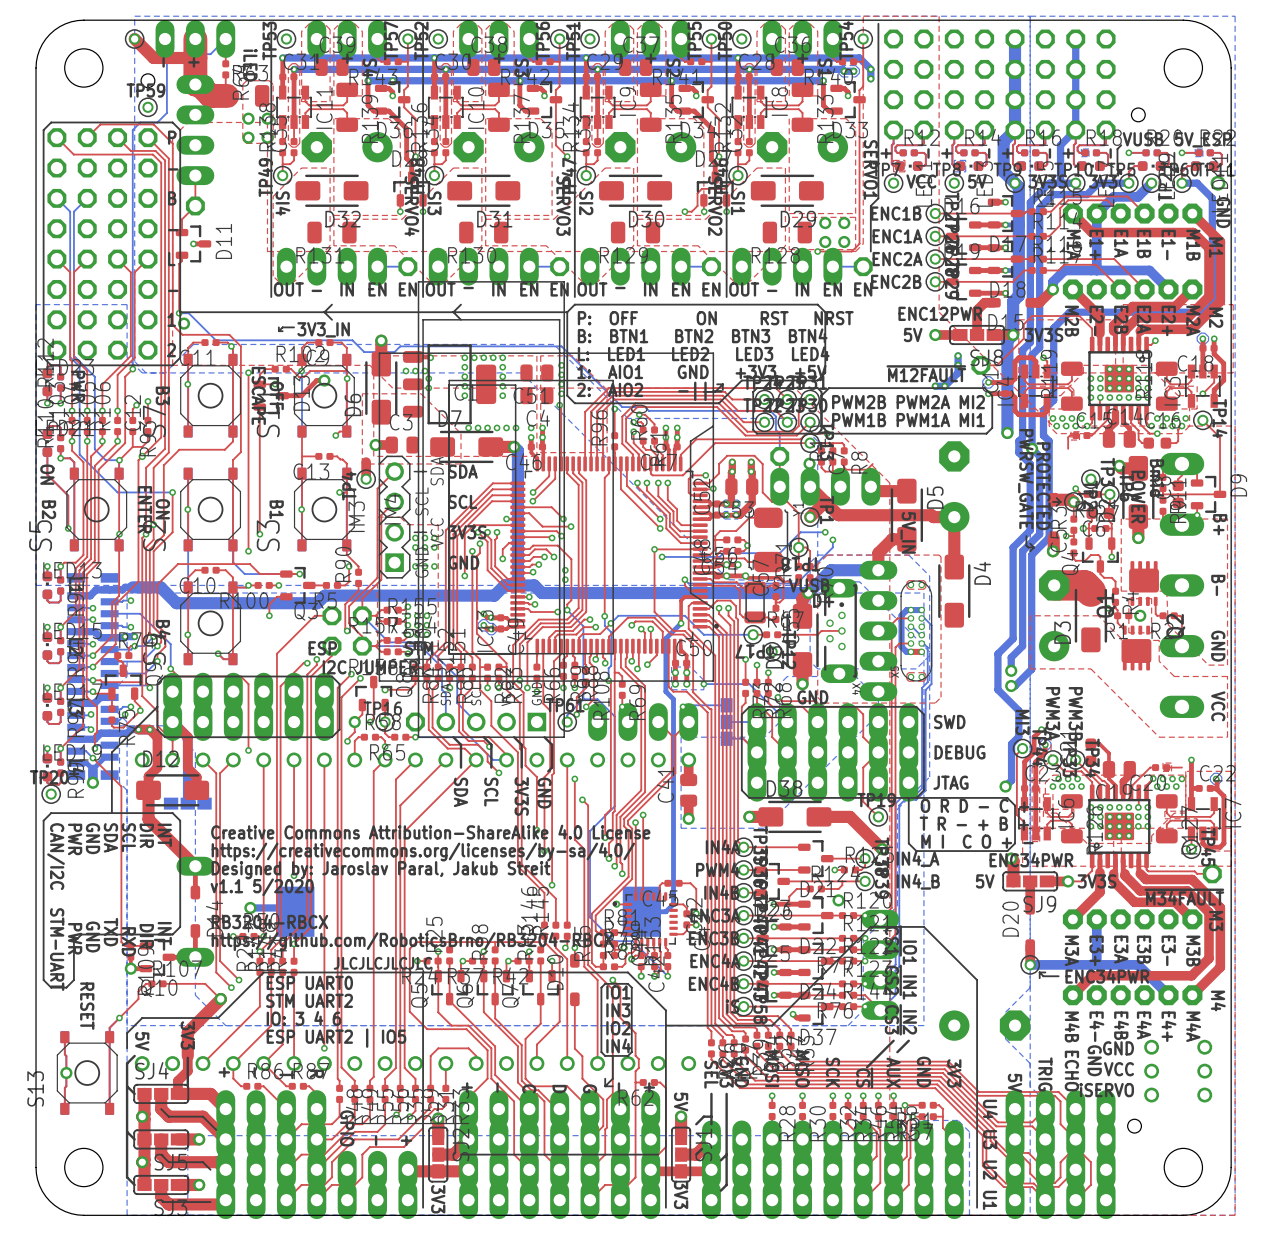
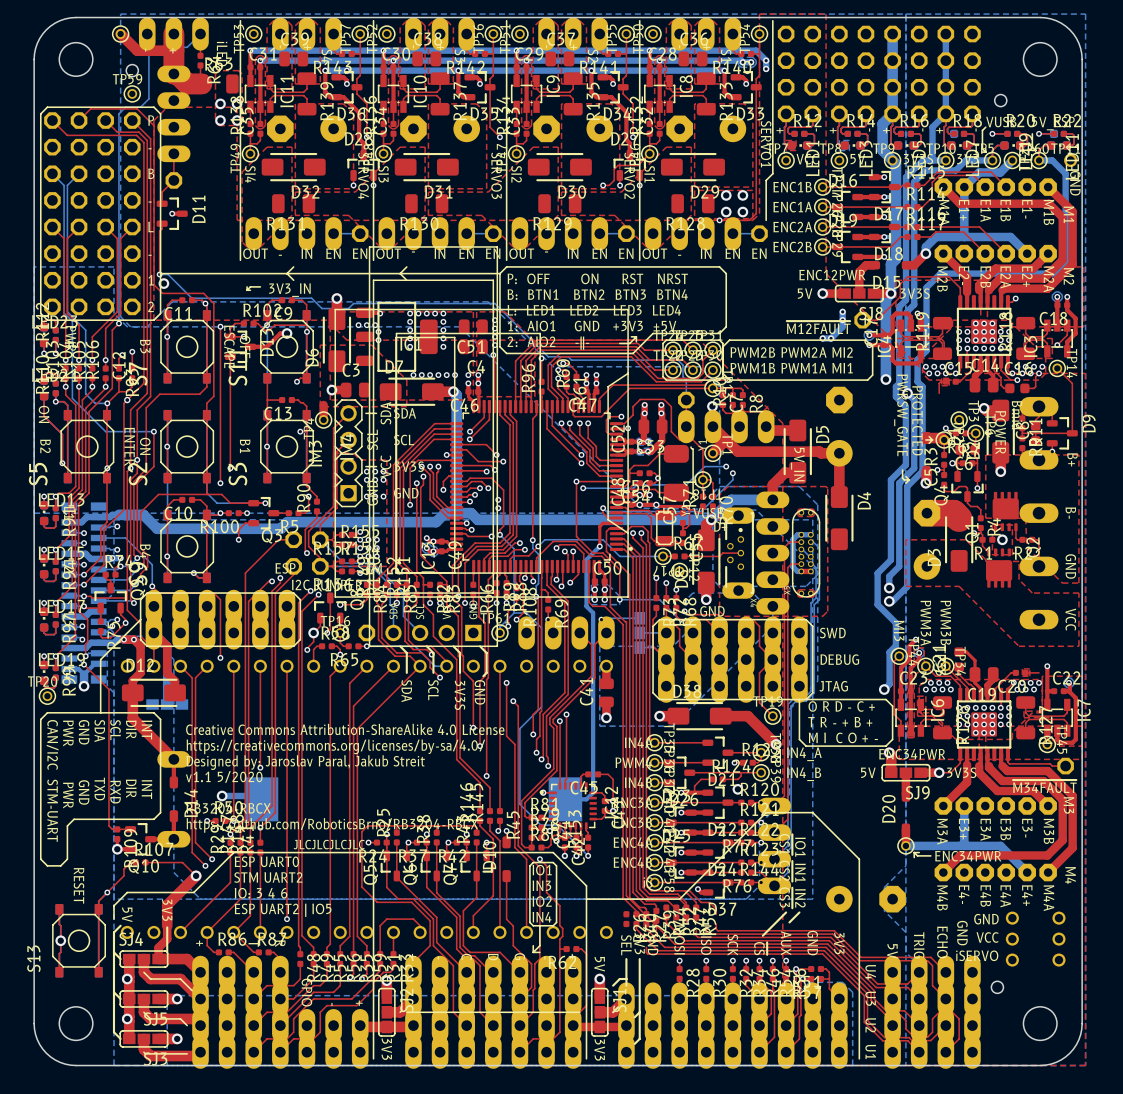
top track: none -> (684, 890) (689, 890) (701, 902) (709, 902) (716, 909) (716, 914)
top track: (711, 1021) (711, 1025) (722, 1036) (722, 1042) -> (626, 895) (656, 925) (656, 934)
top track: (707, 1023) (707, 1027) (711, 1031) (711, 1042) -> (623, 897) (646, 920) (646, 923)
top track: (762, 1023) (768, 1029) (768, 1035) -> (671, 897) (677, 897) (696, 917)
top track: (755, 1027) (756, 1035) -> (664, 900) (668, 900) (686, 919)
top track: (768, 1046) (768, 1052) (785, 1069) (793, 1069) -> (696, 930) (697, 937)
top track: (791, 1050) (800, 1061) (815, 1061) -> (716, 923) (717, 930)
top track: (779, 1052) (793, 1065) (804, 1065) -> (706, 927) (707, 934)
top track: (711, 1053) (711, 1059) (739, 1088) -> (646, 947) (646, 952) (651, 954)

